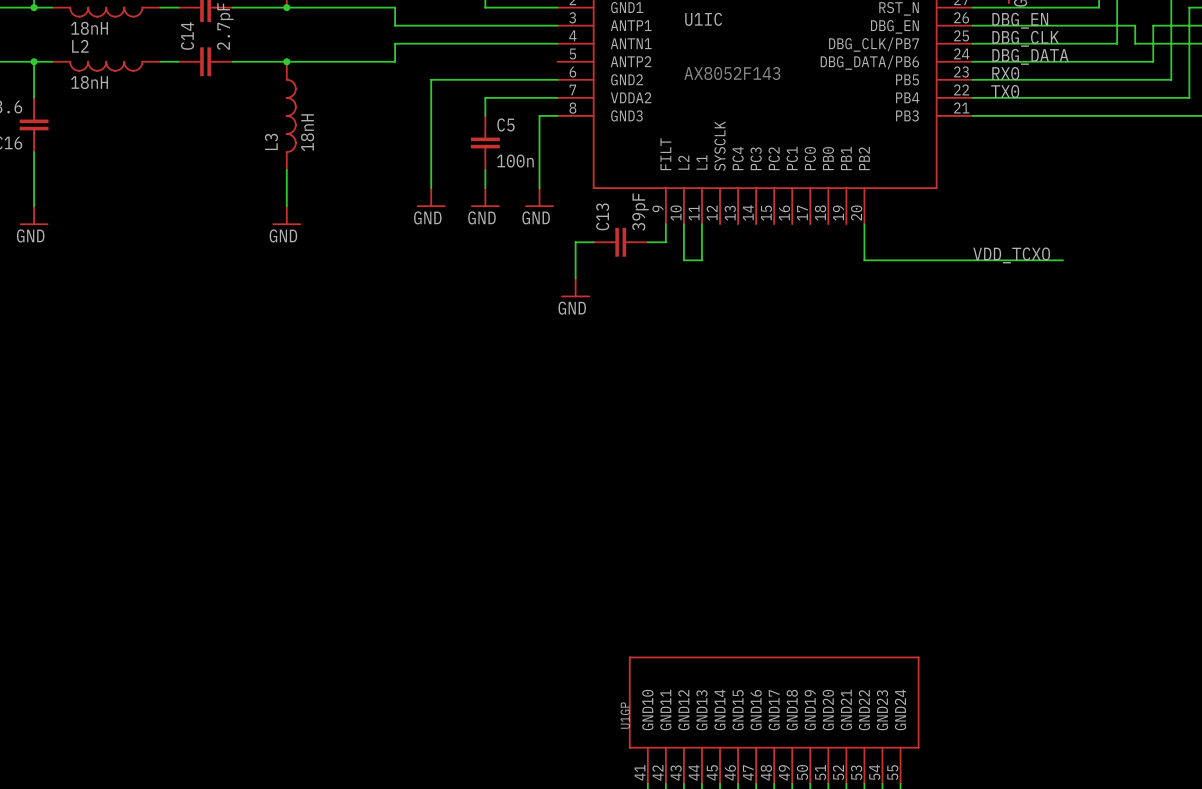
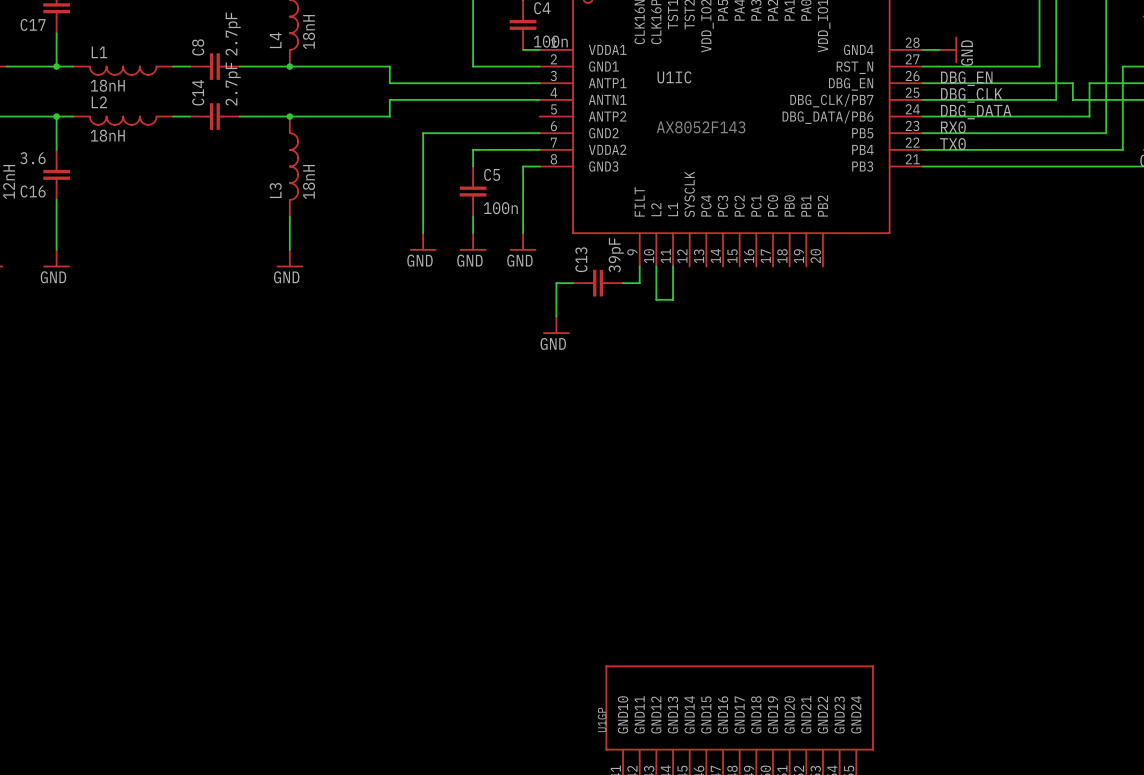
wire: (864, 224) (864, 260) (1063, 260) -> none
label: VDD_TCXO (1011, 255) -> none

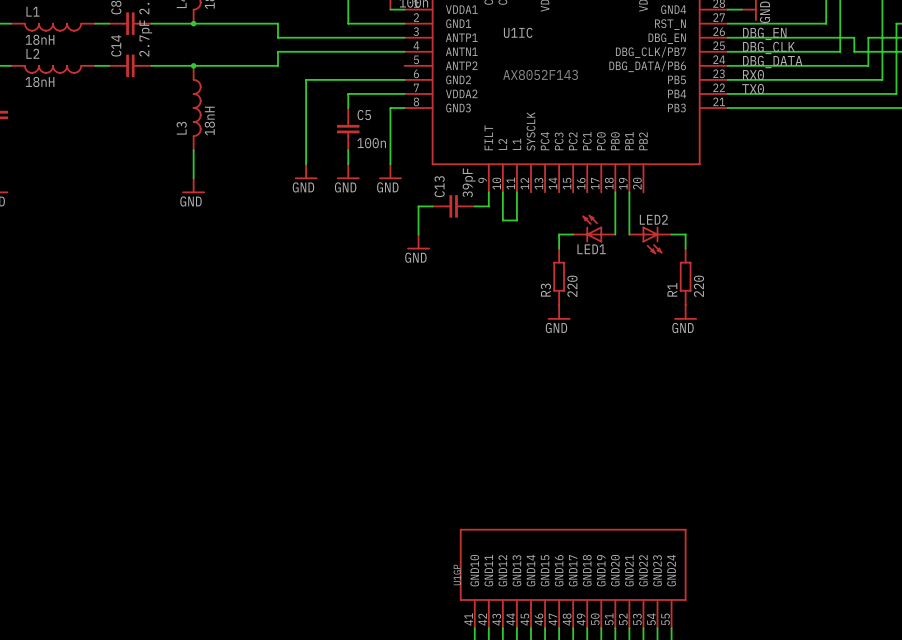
wire: none -> (615, 192) (615, 234)
wire: none -> (629, 192) (629, 234)
LED1: none -> (594, 228)
wire: none -> (573, 234) (559, 234) (559, 248)
wire: none -> (671, 234) (685, 234) (685, 248)
LED2: none -> (650, 240)
R3: none -> 220 (559, 276)
R1: none -> 220 (685, 276)
power symbol: none -> GND (559, 312)
power symbol: none -> GND (685, 312)

